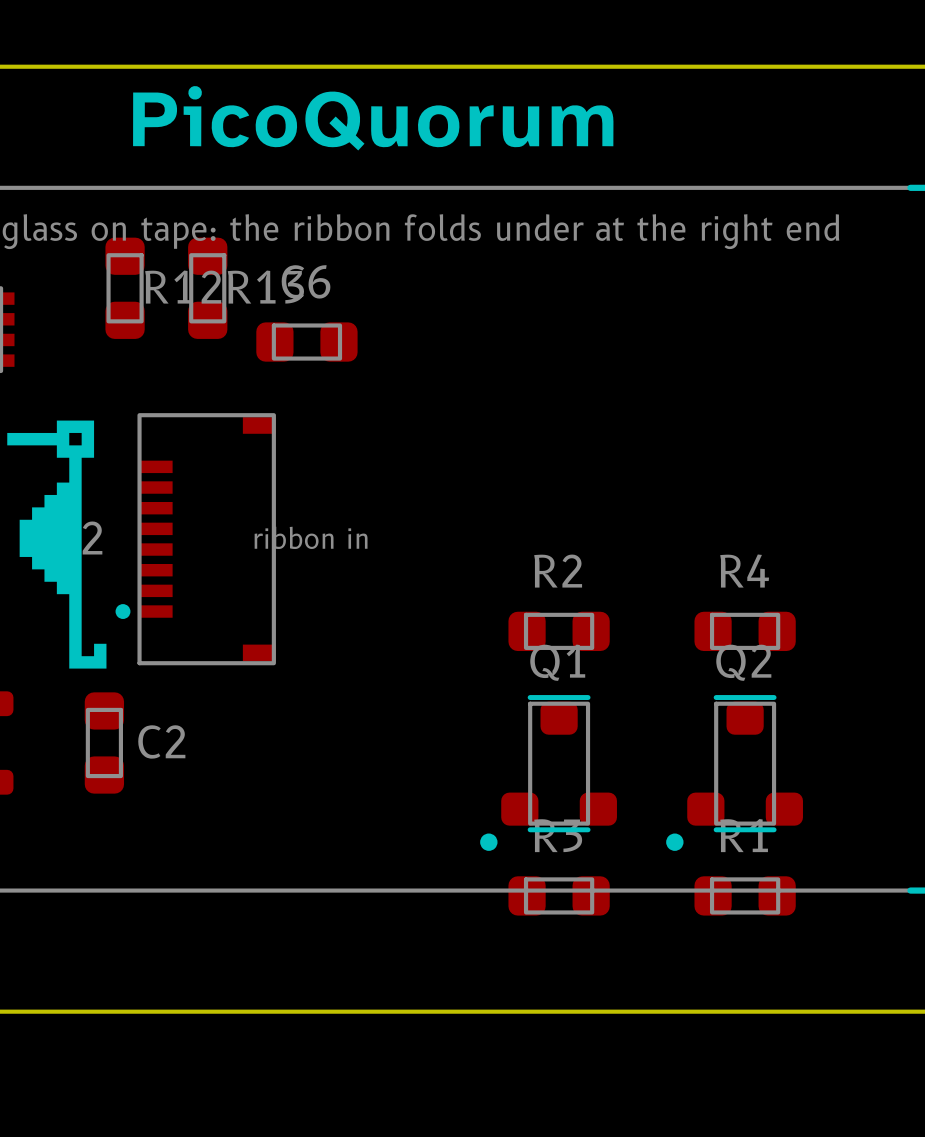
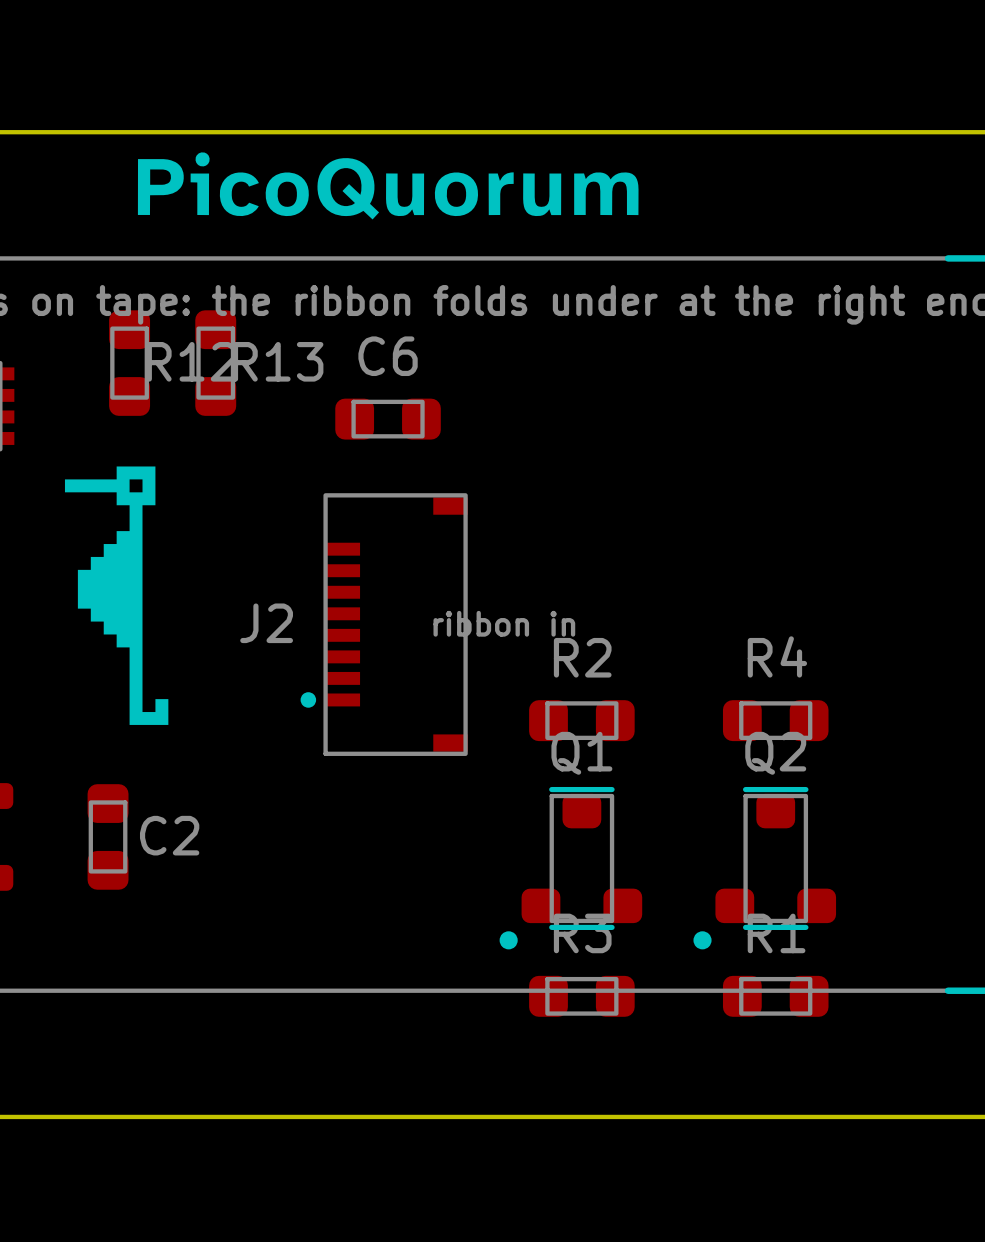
C6 position: (306, 342) -> (388, 419)
drawing: none -> [90, 466, 156, 648]
drawing: [32, 420, 95, 595] -> none
drawing position: (38, 439) -> (97, 485)
drawing position: (75, 470) -> (136, 518)
drawing position: (50, 538) -> (110, 589)
J2 position: (195, 539) -> (384, 624)
drawing: none -> [129, 712, 169, 725]
drawing position: (75, 625) -> (136, 679)
drawing position: (100, 649) -> (161, 705)
drawing: [69, 656, 107, 669] -> none

